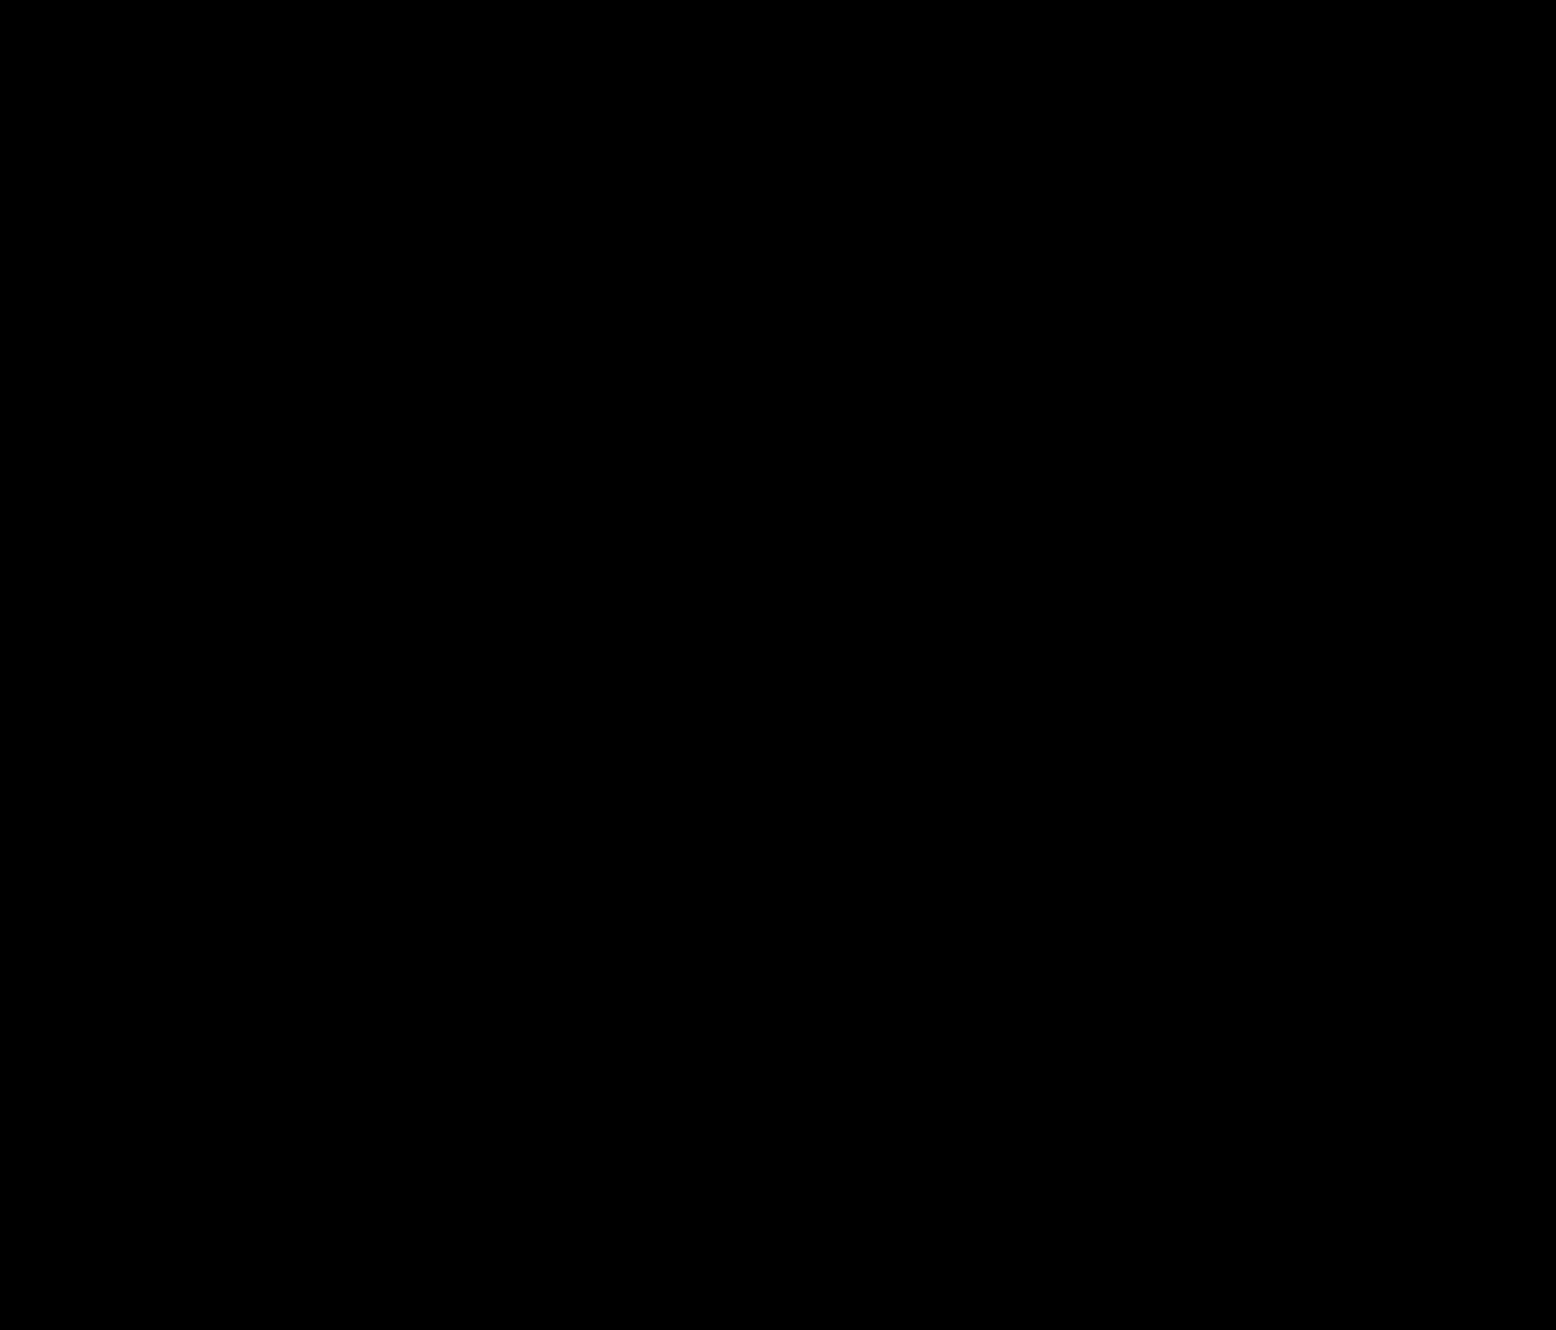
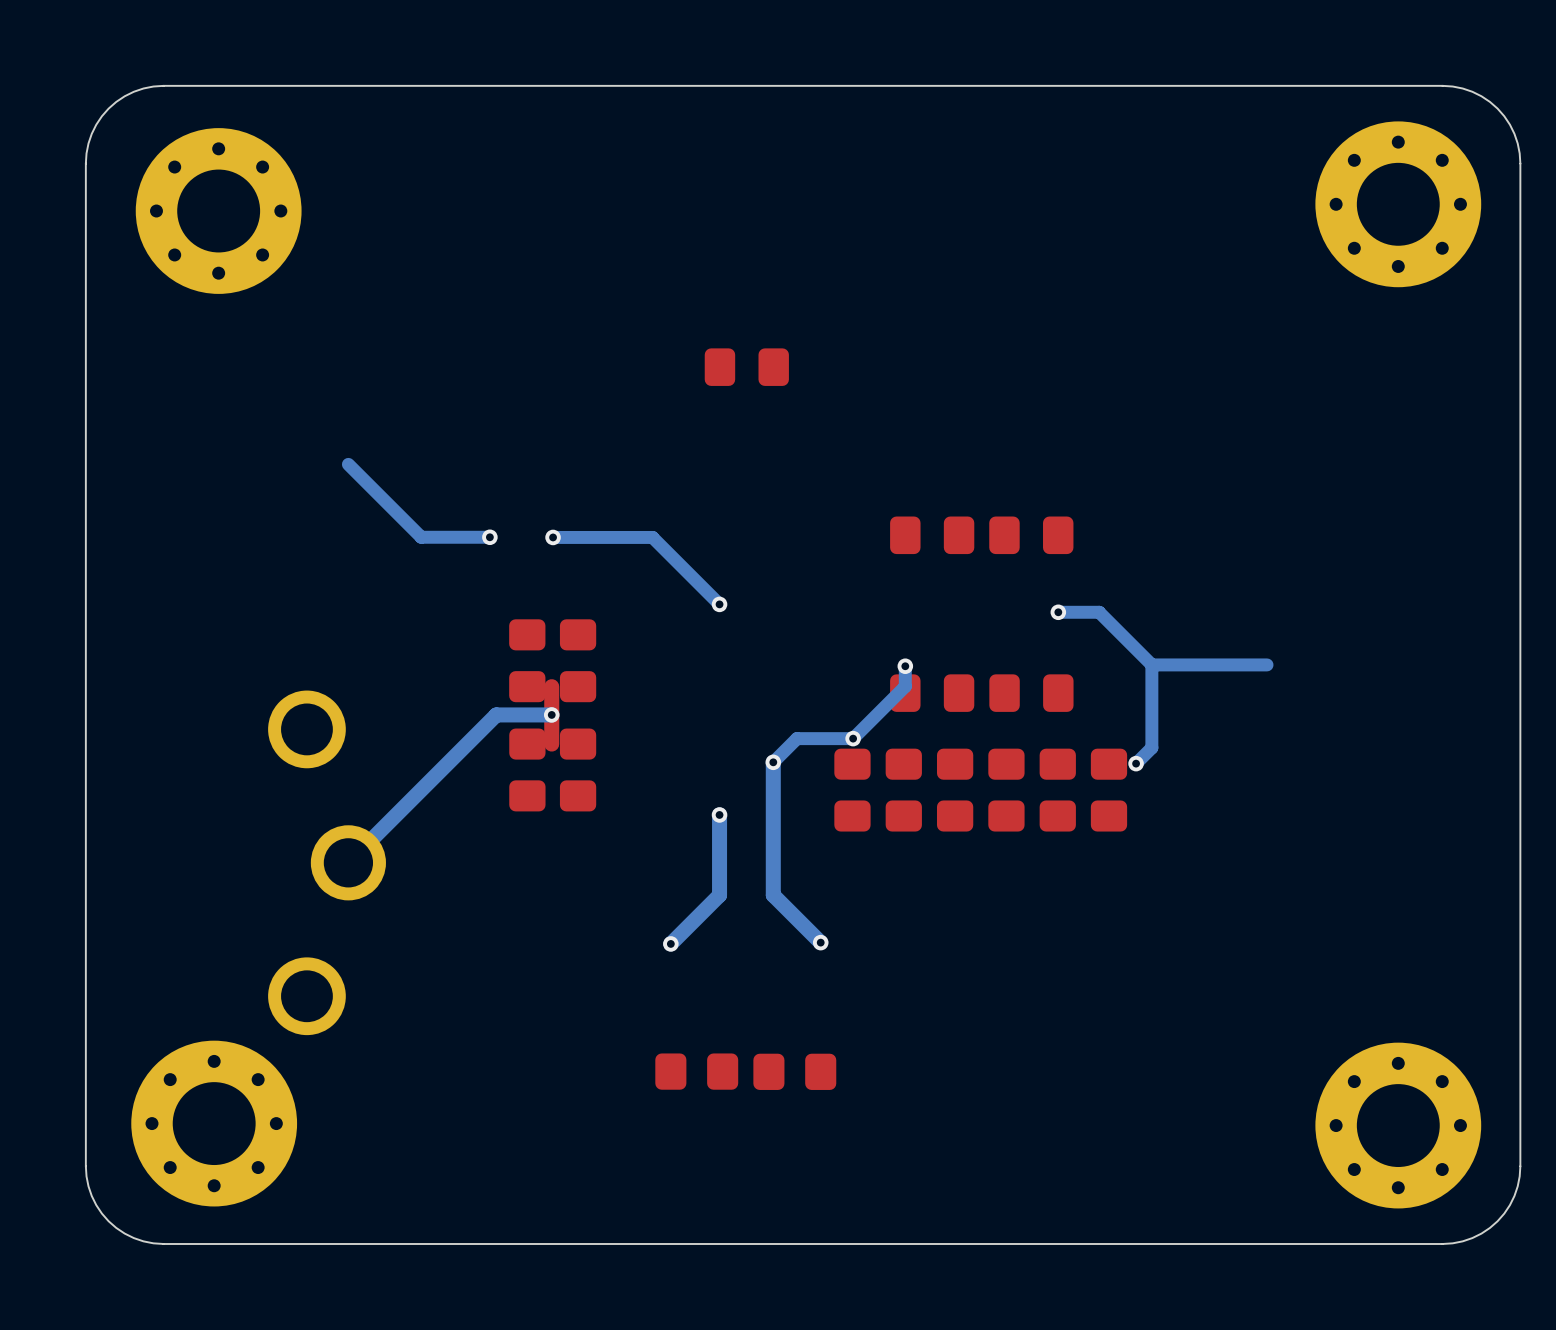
board edge: none -> (1442, 85) (163, 85) (143, 88) (116, 101) (96, 124) (88, 143) (85, 163) (85, 1166) (88, 1186) (101, 1213) (124, 1233) (143, 1241) (163, 1243) (1442, 1243) (1472, 1238) (1489, 1227) (1509, 1205) (1517, 1186) (1520, 1166) (1520, 163) (1514, 133) (1497, 108) (1472, 91) (1442, 85)
part: none -> (1398, 204)
part: none -> (218, 211)
part: none -> (746, 367)
bottom track: none -> (348, 464) (421, 537) (489, 537)
part: none -> (932, 535)
part: none -> (1031, 535)
via: none -> (489, 537)
bottom track: none -> (553, 537) (652, 537) (719, 604)
via: none -> (553, 537)
via: none -> (719, 604)
bottom track: none -> (1058, 612) (1099, 612) (1151, 664)
via: none -> (1058, 612)
part: none -> (527, 660)
part: none -> (578, 660)
bottom track: none -> (1151, 664) (1151, 747) (1136, 763)
bottom track: none -> (1267, 664) (1151, 664)
bottom track: none -> (905, 666) (905, 686) (853, 738) (796, 738) (773, 762) (773, 895) (820, 942)
via: none -> (905, 666)
top track: none -> (551, 686) (551, 744)
part: none -> (932, 693)
part: none -> (1031, 693)
bottom track: none -> (551, 714) (496, 714) (348, 862)
via: none -> (551, 714)
via: none -> (853, 738)
via: none -> (773, 762)
via: none -> (1136, 763)
part: none -> (527, 769)
part: none -> (578, 769)
part: none -> (852, 790)
part: none -> (903, 790)
part: none -> (955, 790)
part: none -> (1006, 790)
part: none -> (1057, 790)
part: none -> (1108, 790)
bottom track: none -> (719, 814) (719, 895) (670, 943)
via: none -> (719, 814)
part: none -> (327, 862)
via: none -> (820, 942)
via: none -> (670, 943)
part: none -> (696, 1071)
part: none -> (794, 1071)
part: none -> (214, 1123)
part: none -> (1398, 1125)

